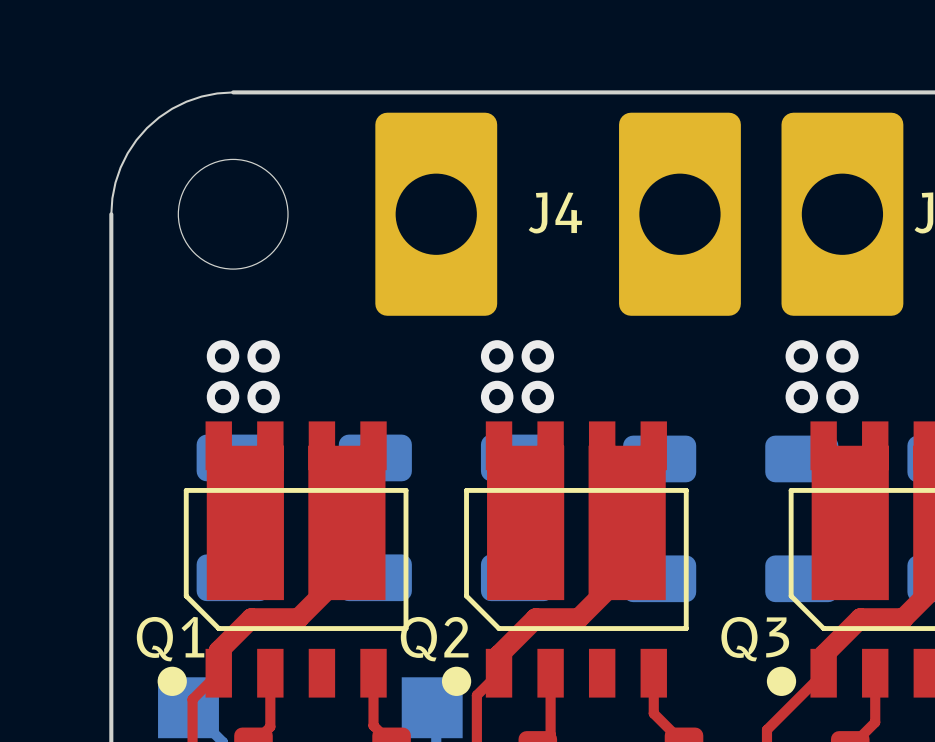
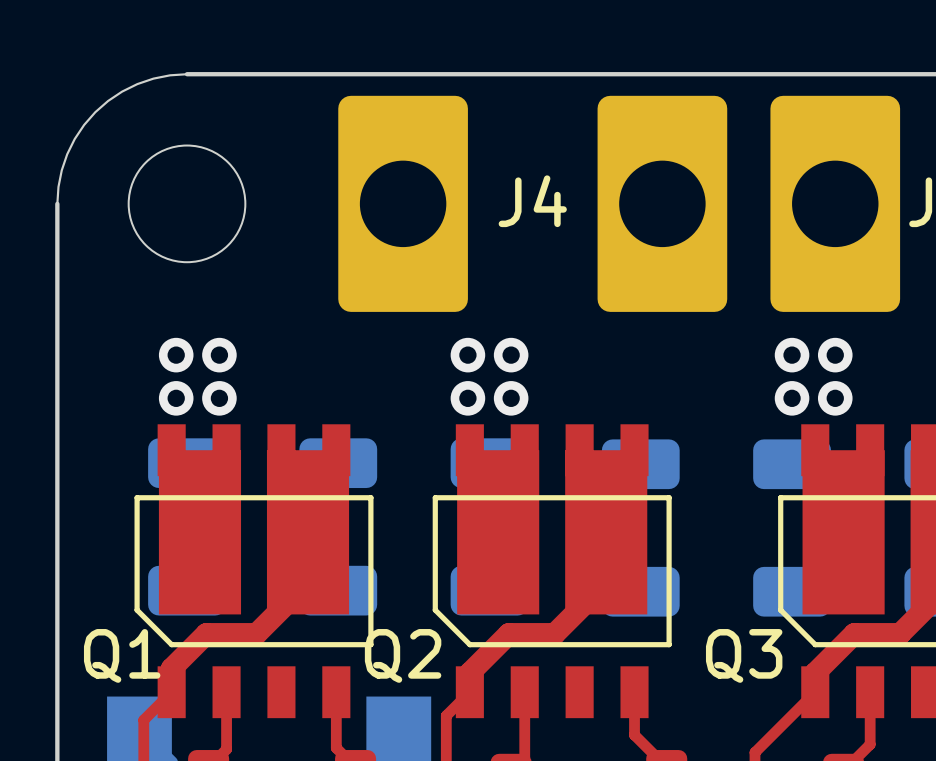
drawing: [157, 666, 187, 696] -> none
drawing: [441, 666, 472, 696] -> none
drawing: [766, 666, 797, 696] -> none

